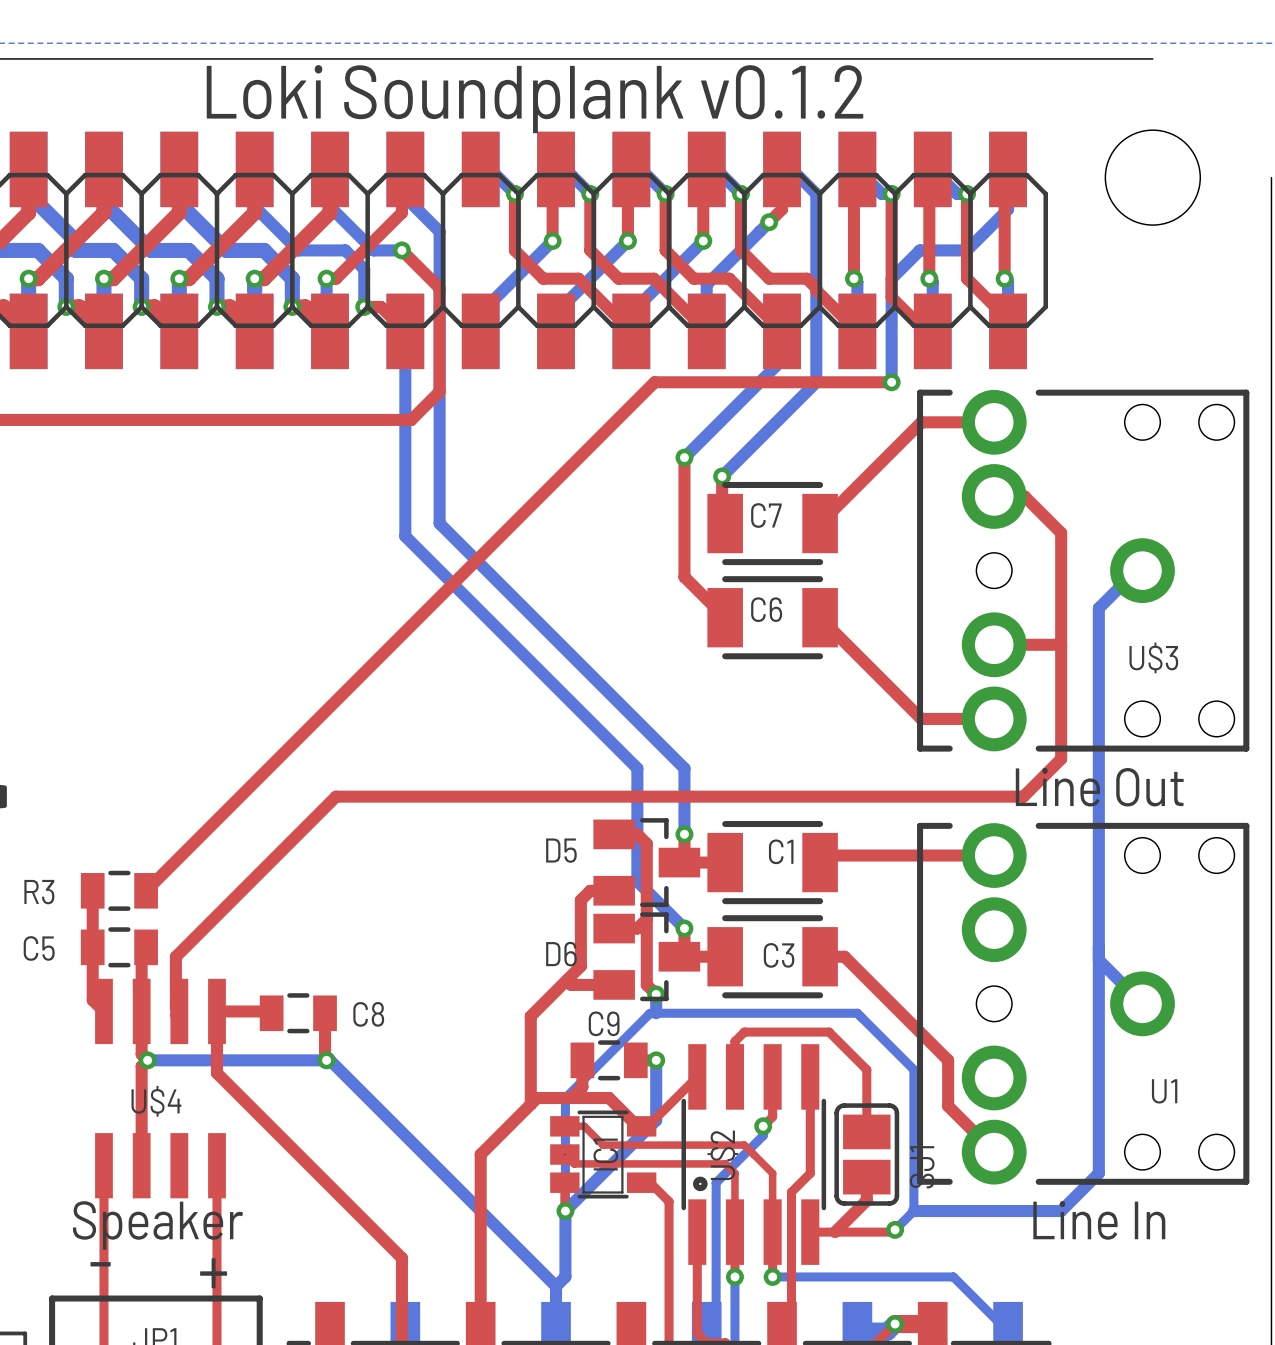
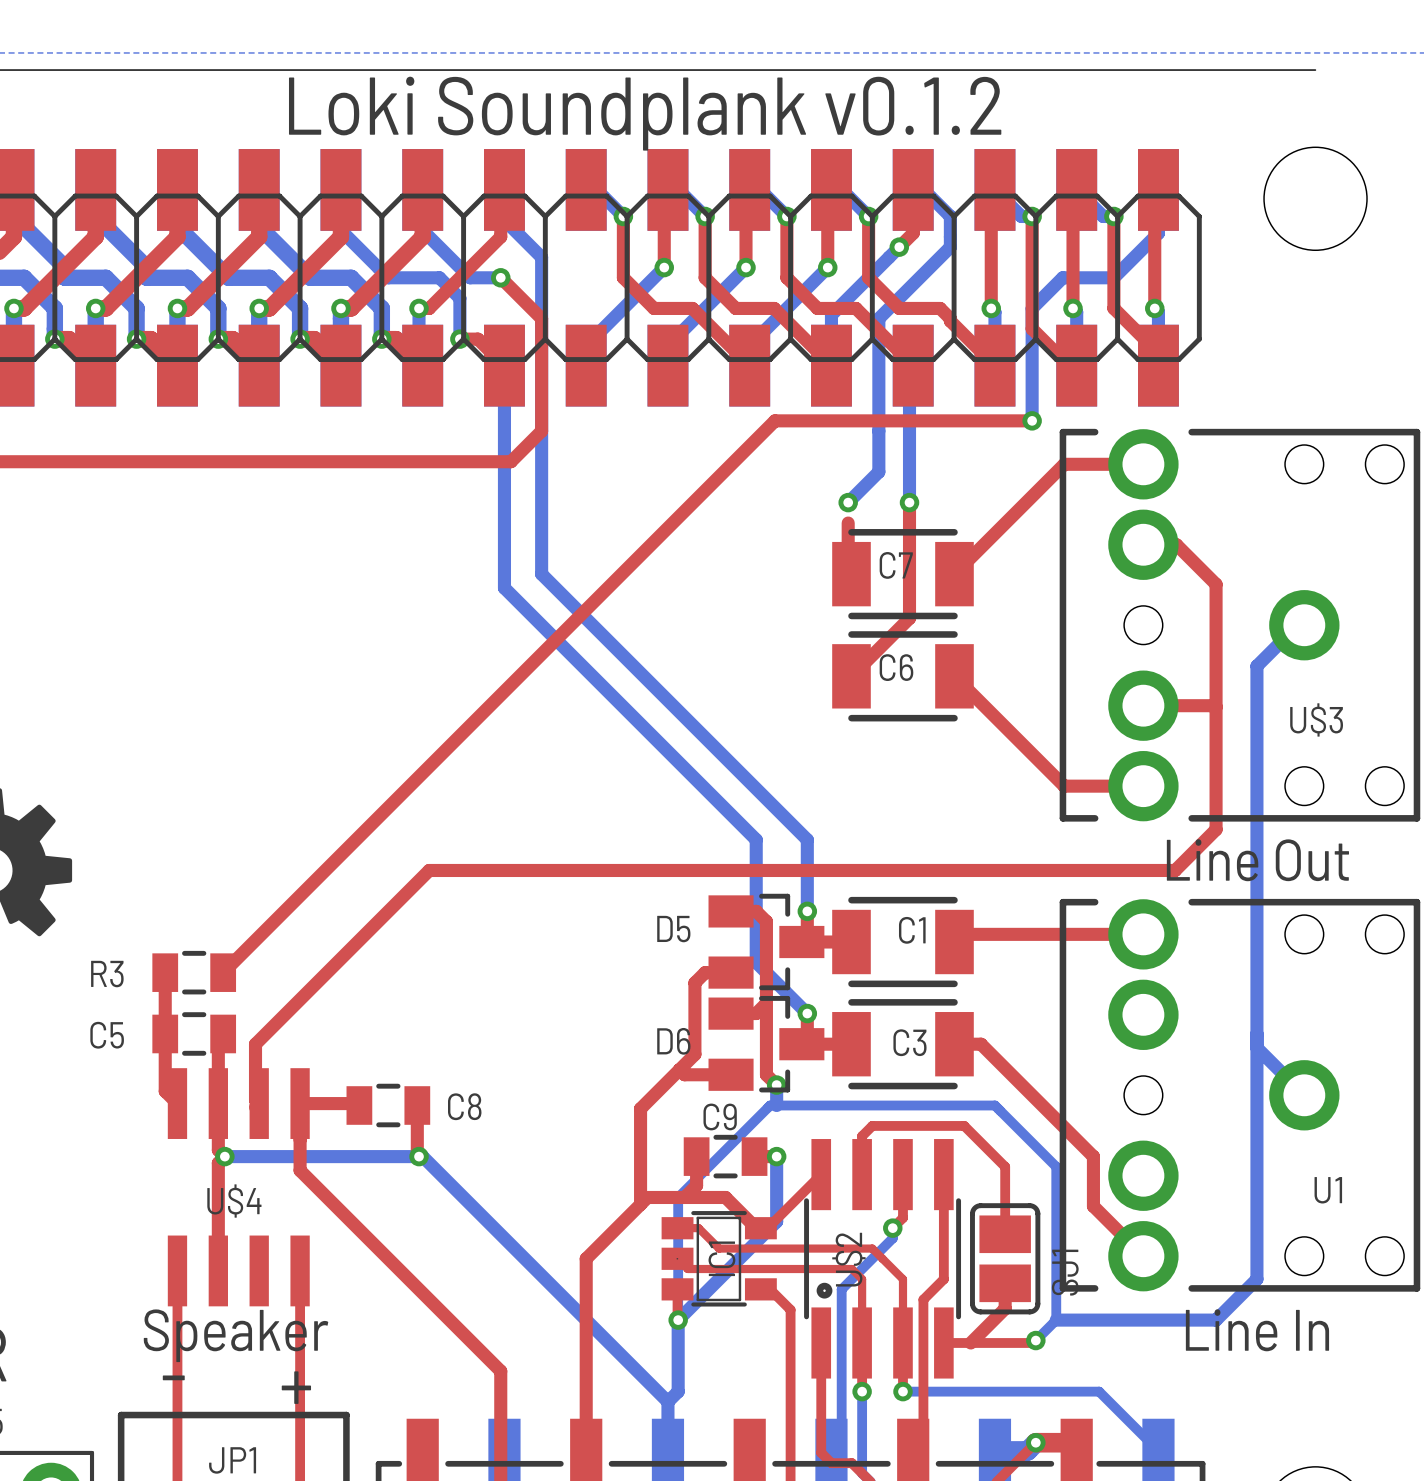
bottom track: (816, 222) (816, 382) (722, 476) -> (950, 247) (878, 318) (878, 471) (848, 502)
bottom track: (782, 331) (782, 360) (684, 457) -> (913, 365) (909, 369) (909, 502)
top track: (684, 457) (684, 577) (725, 617) -> (909, 502) (909, 618) (851, 676)
via: (684, 457) -> none
via: none -> (848, 502)
via: none -> (909, 502)
via: (722, 476) -> none

